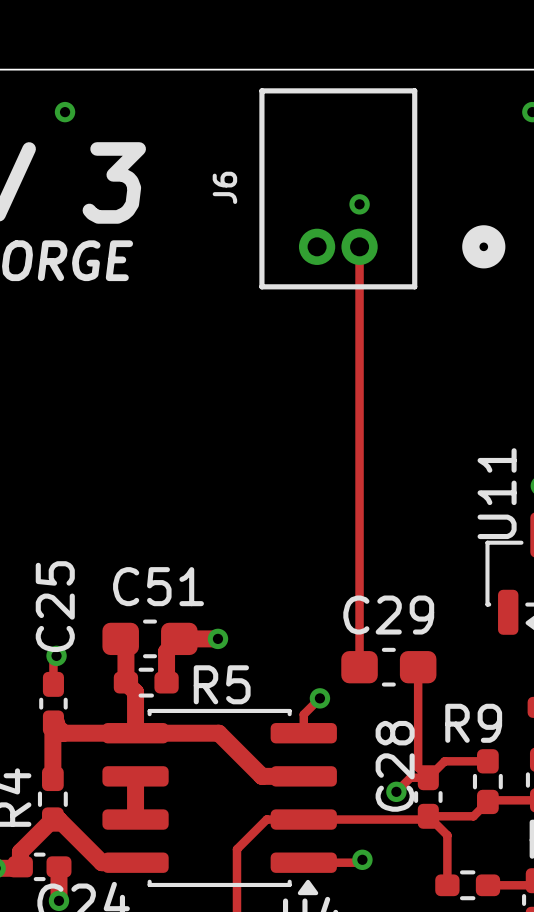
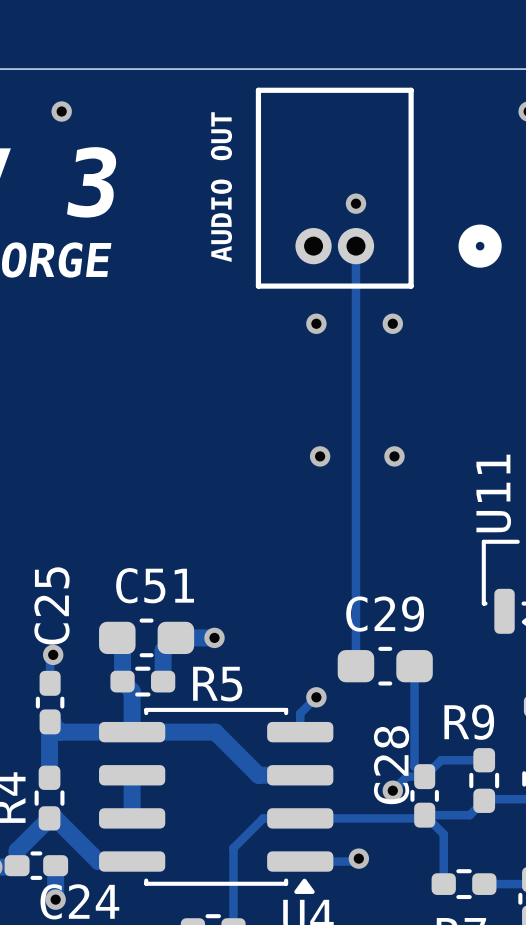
J6 name: J6 (224, 187) -> AUDIO OUT (221, 187)
via: none -> (316, 323)
via: none -> (392, 323)
via: none -> (320, 456)
via: none -> (394, 456)

